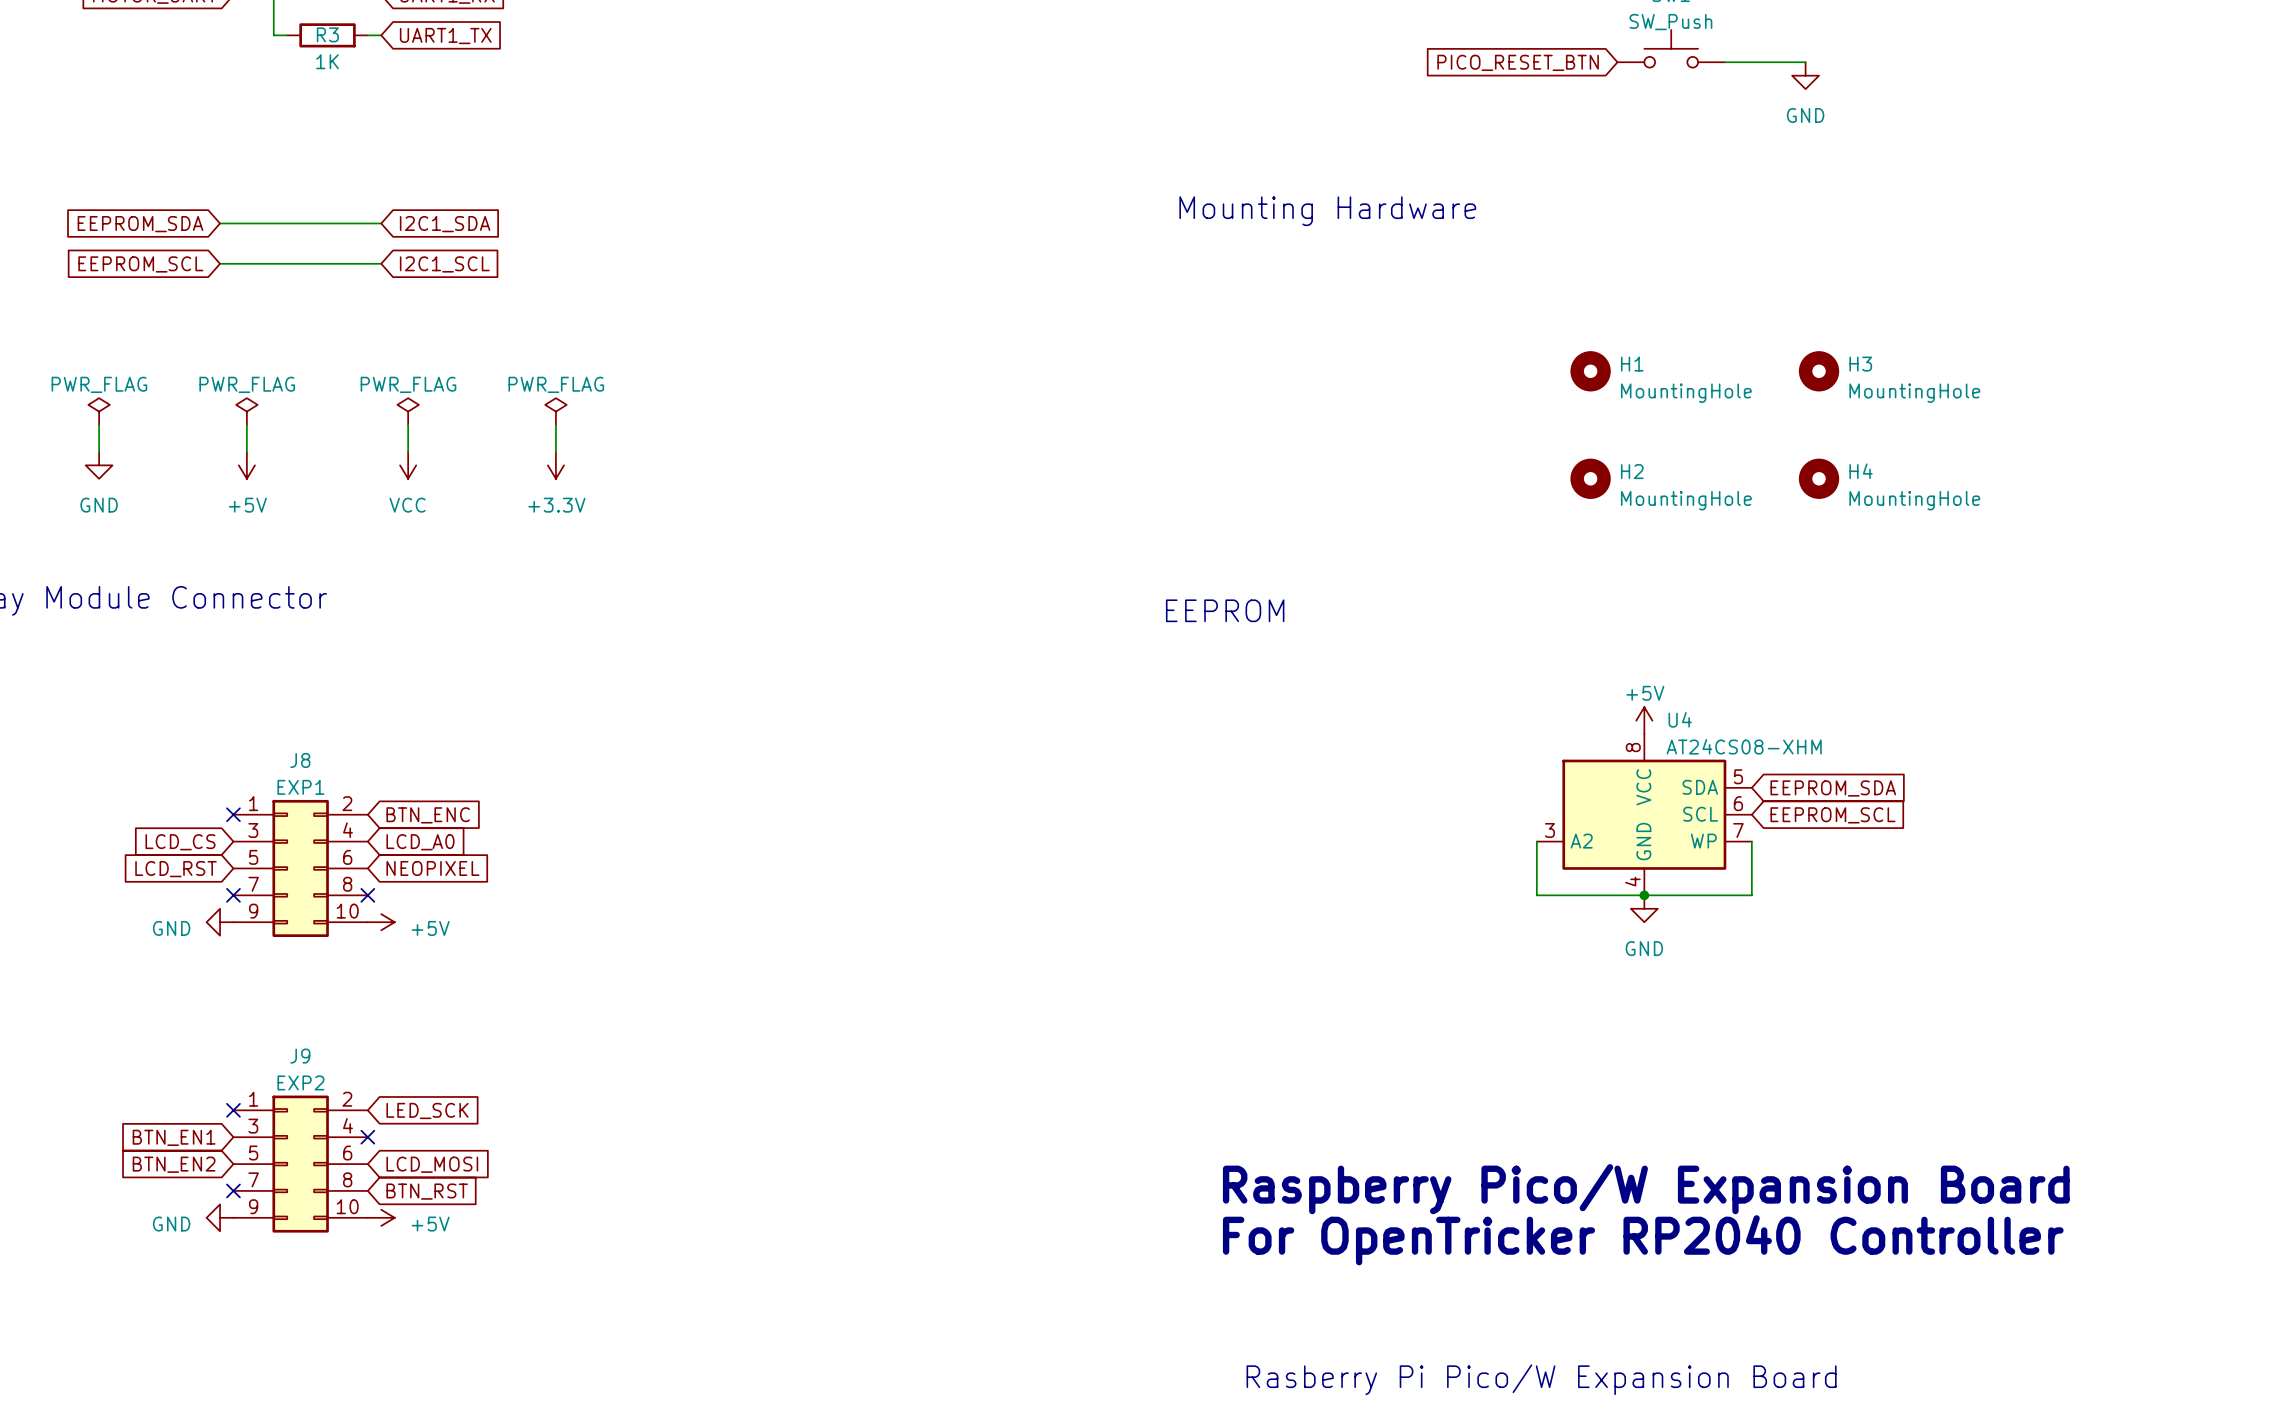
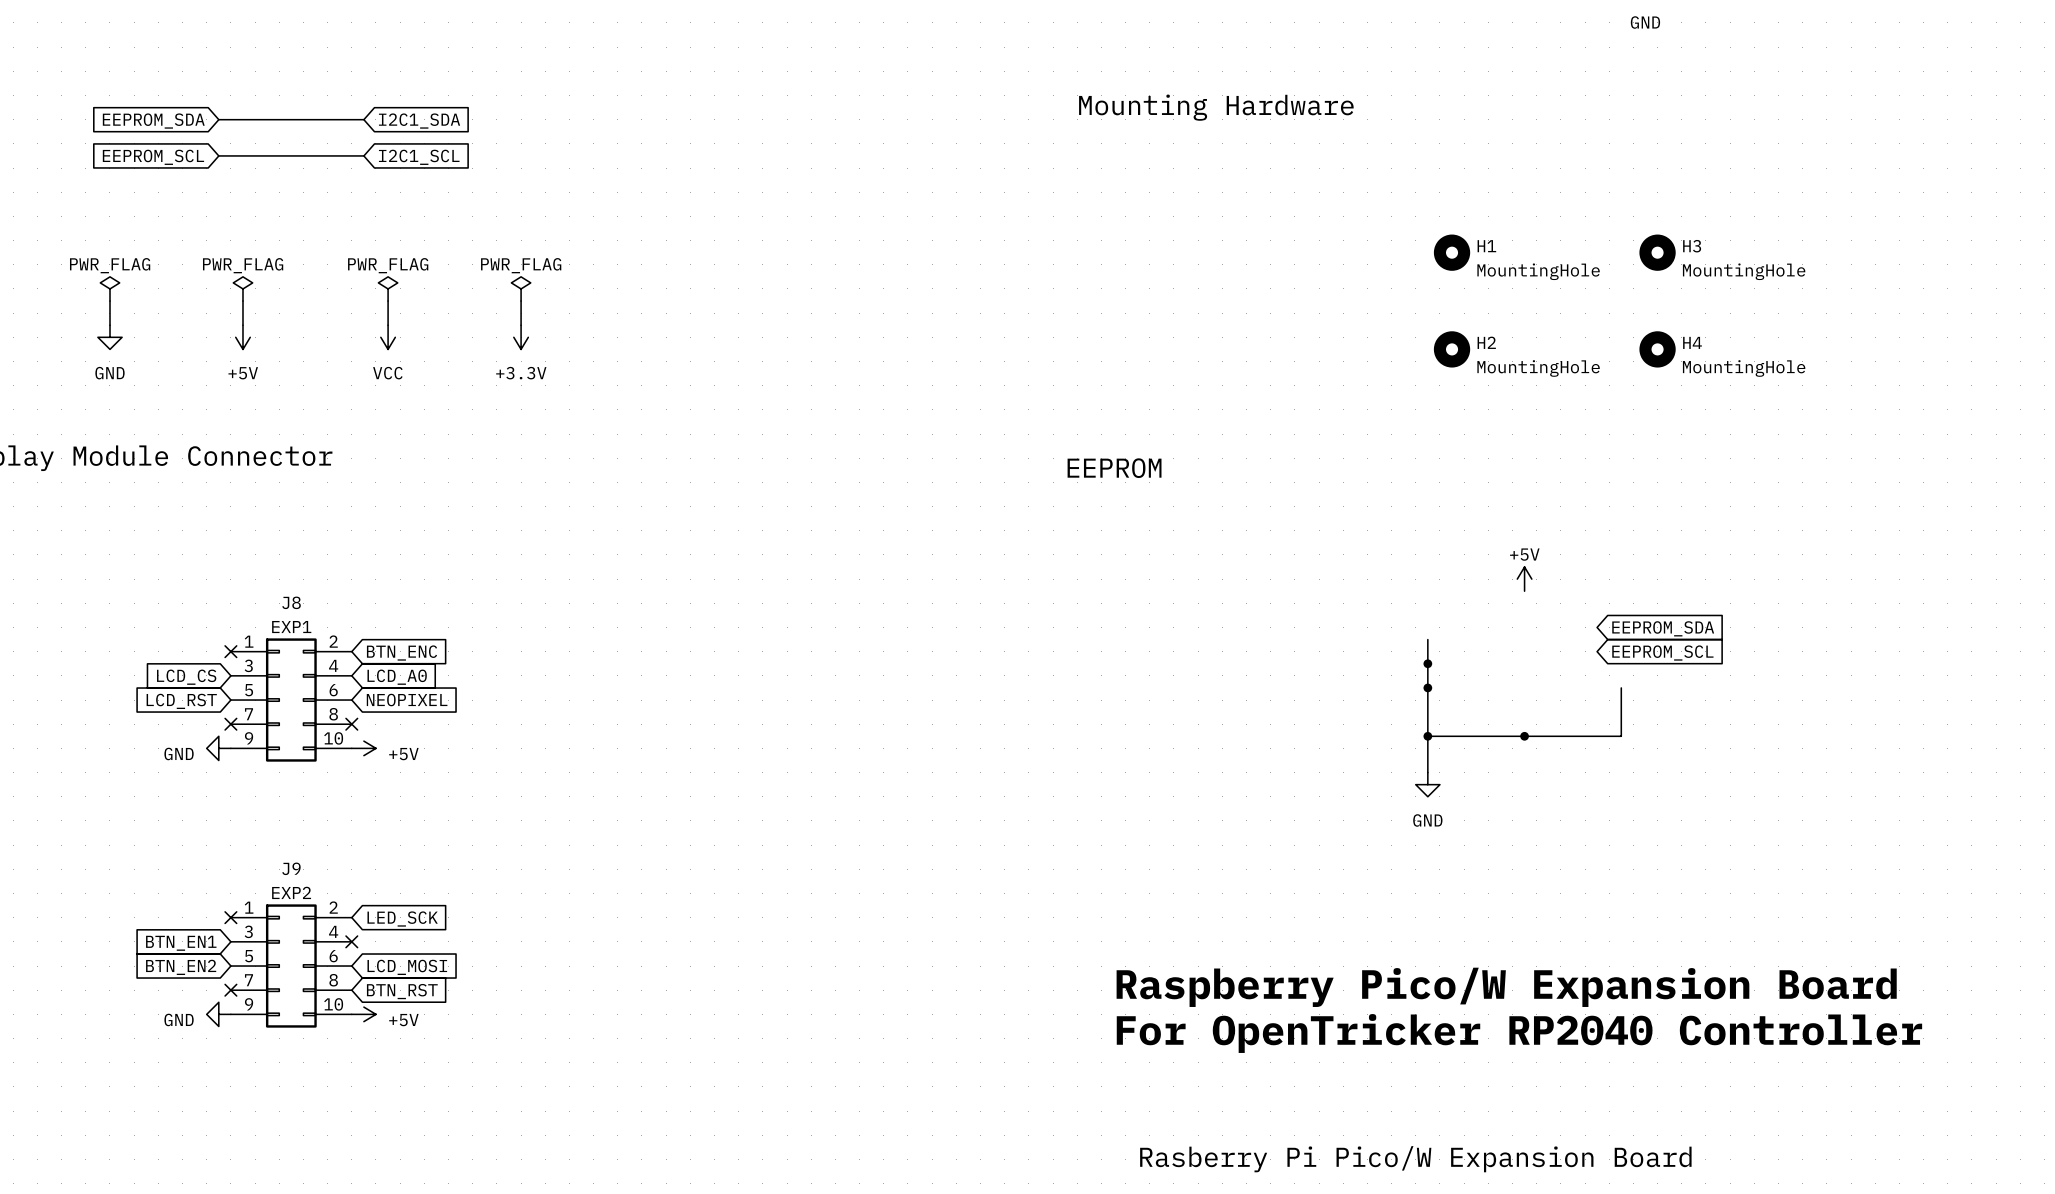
power symbol position: +5V (1644, 720) -> +5V (1524, 579)
wire: none -> (1427, 639) (1427, 772)
U4: AT24CS08-XHM (1644, 814) -> none
junction: none -> (1427, 663)
wire: (1536, 841) (1536, 895) (1751, 895) (1751, 841) -> none
junction: none -> (1427, 687)
wire: none -> (1621, 687) (1621, 736) (1427, 736)
junction position: (1644, 895) -> (1524, 736)
junction: none -> (1427, 736)
power symbol position: GND (1644, 908) -> GND (1427, 784)

